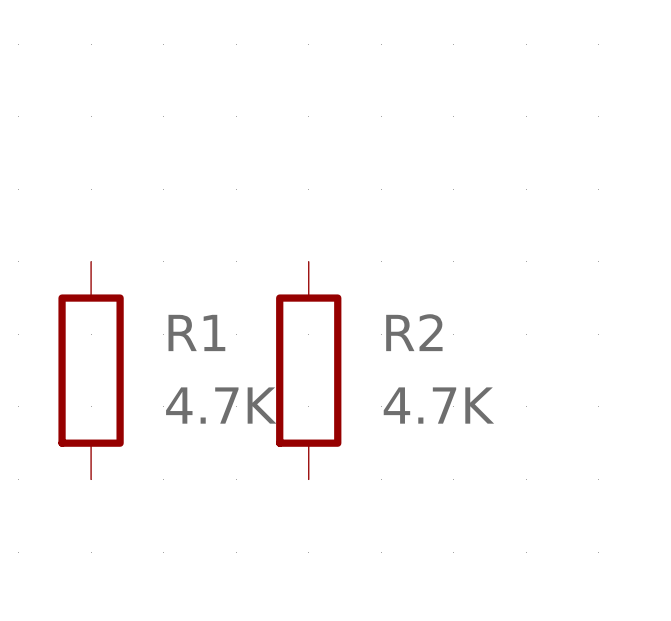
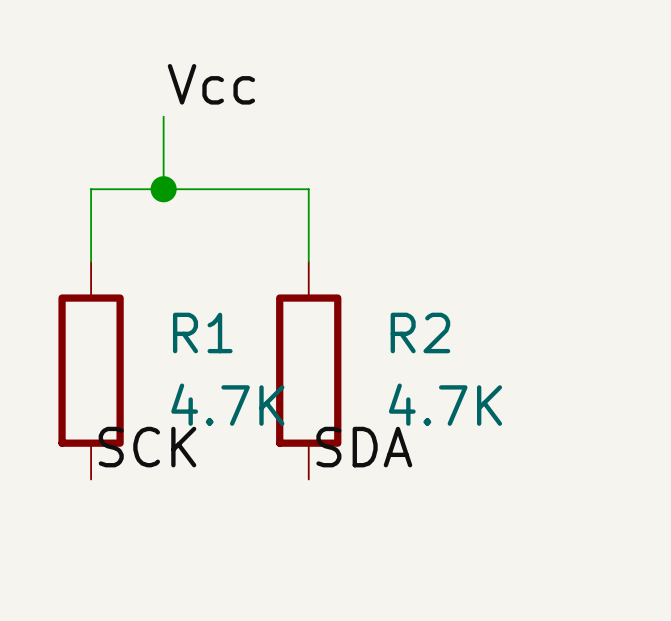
label: none -> Vcc (211, 84)
wire: none -> (163, 116) (163, 189)
junction: none -> (163, 189)
wire: none -> (91, 261) (91, 189) (308, 189) (308, 261)
label: none -> SCK (147, 447)
label: none -> SDA (364, 447)

